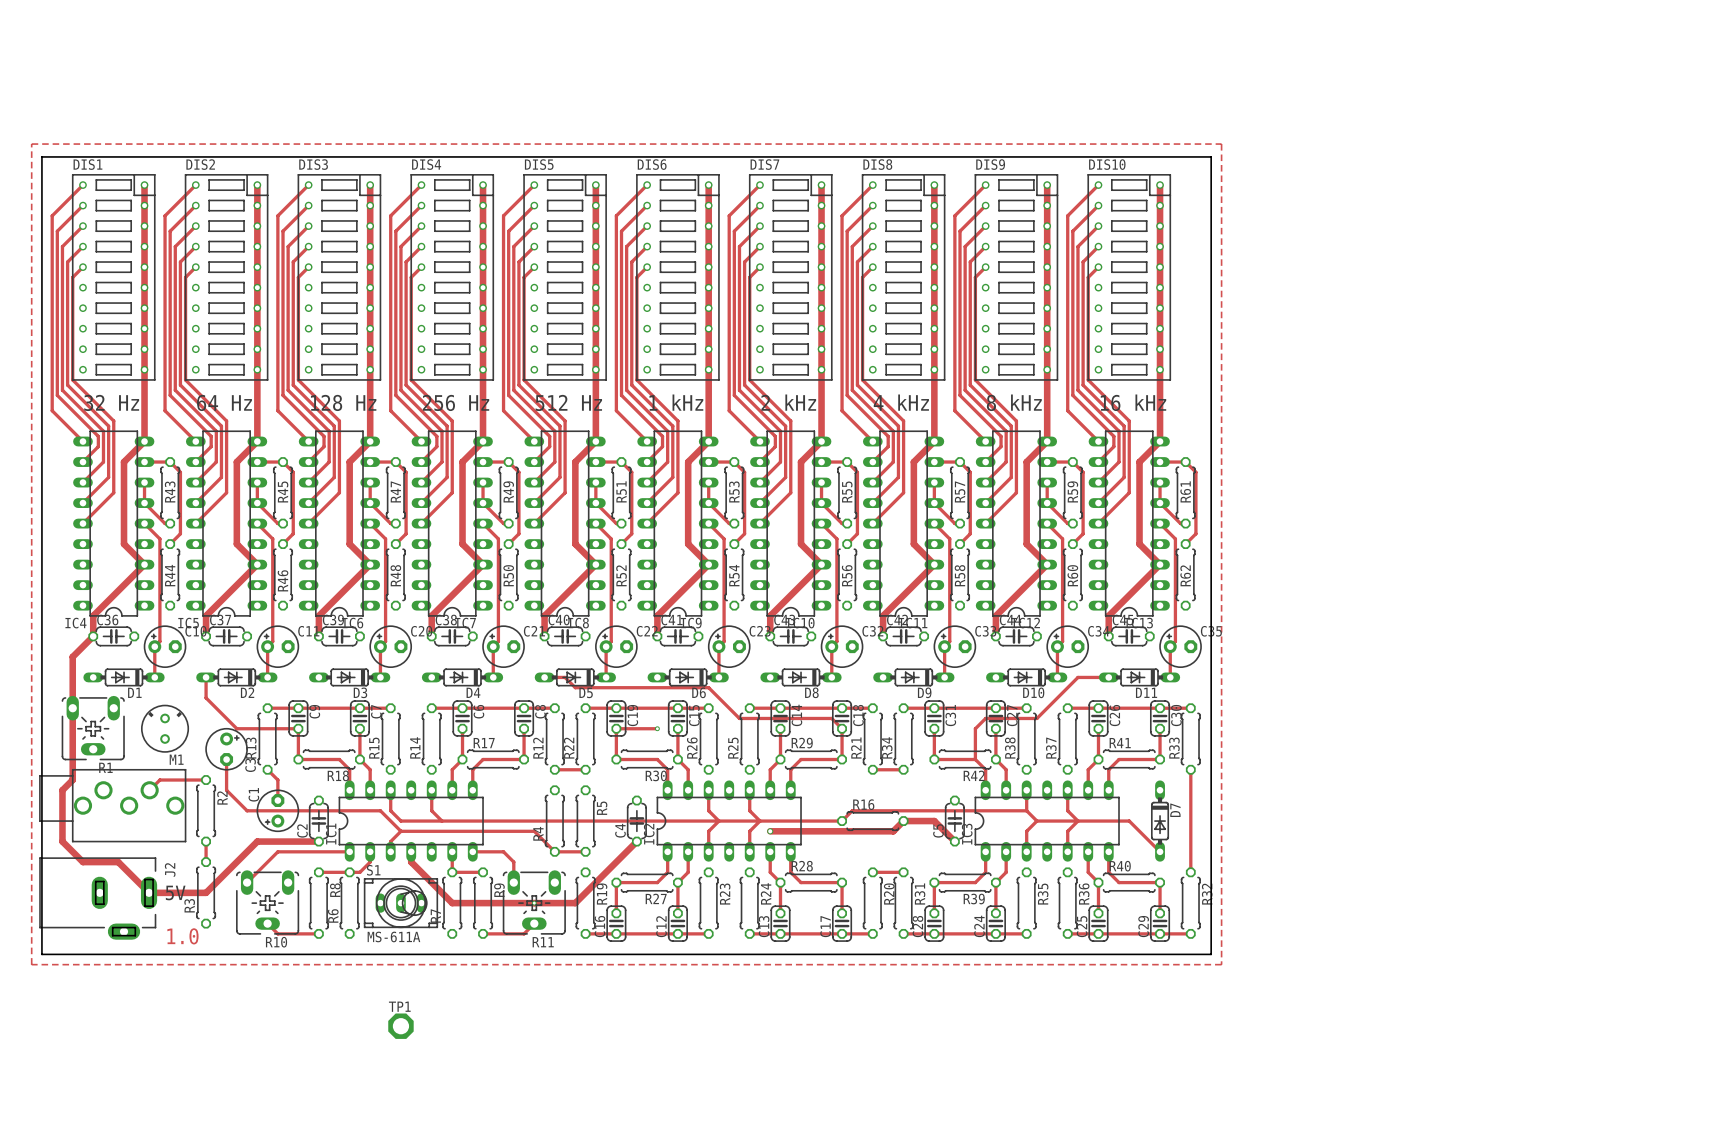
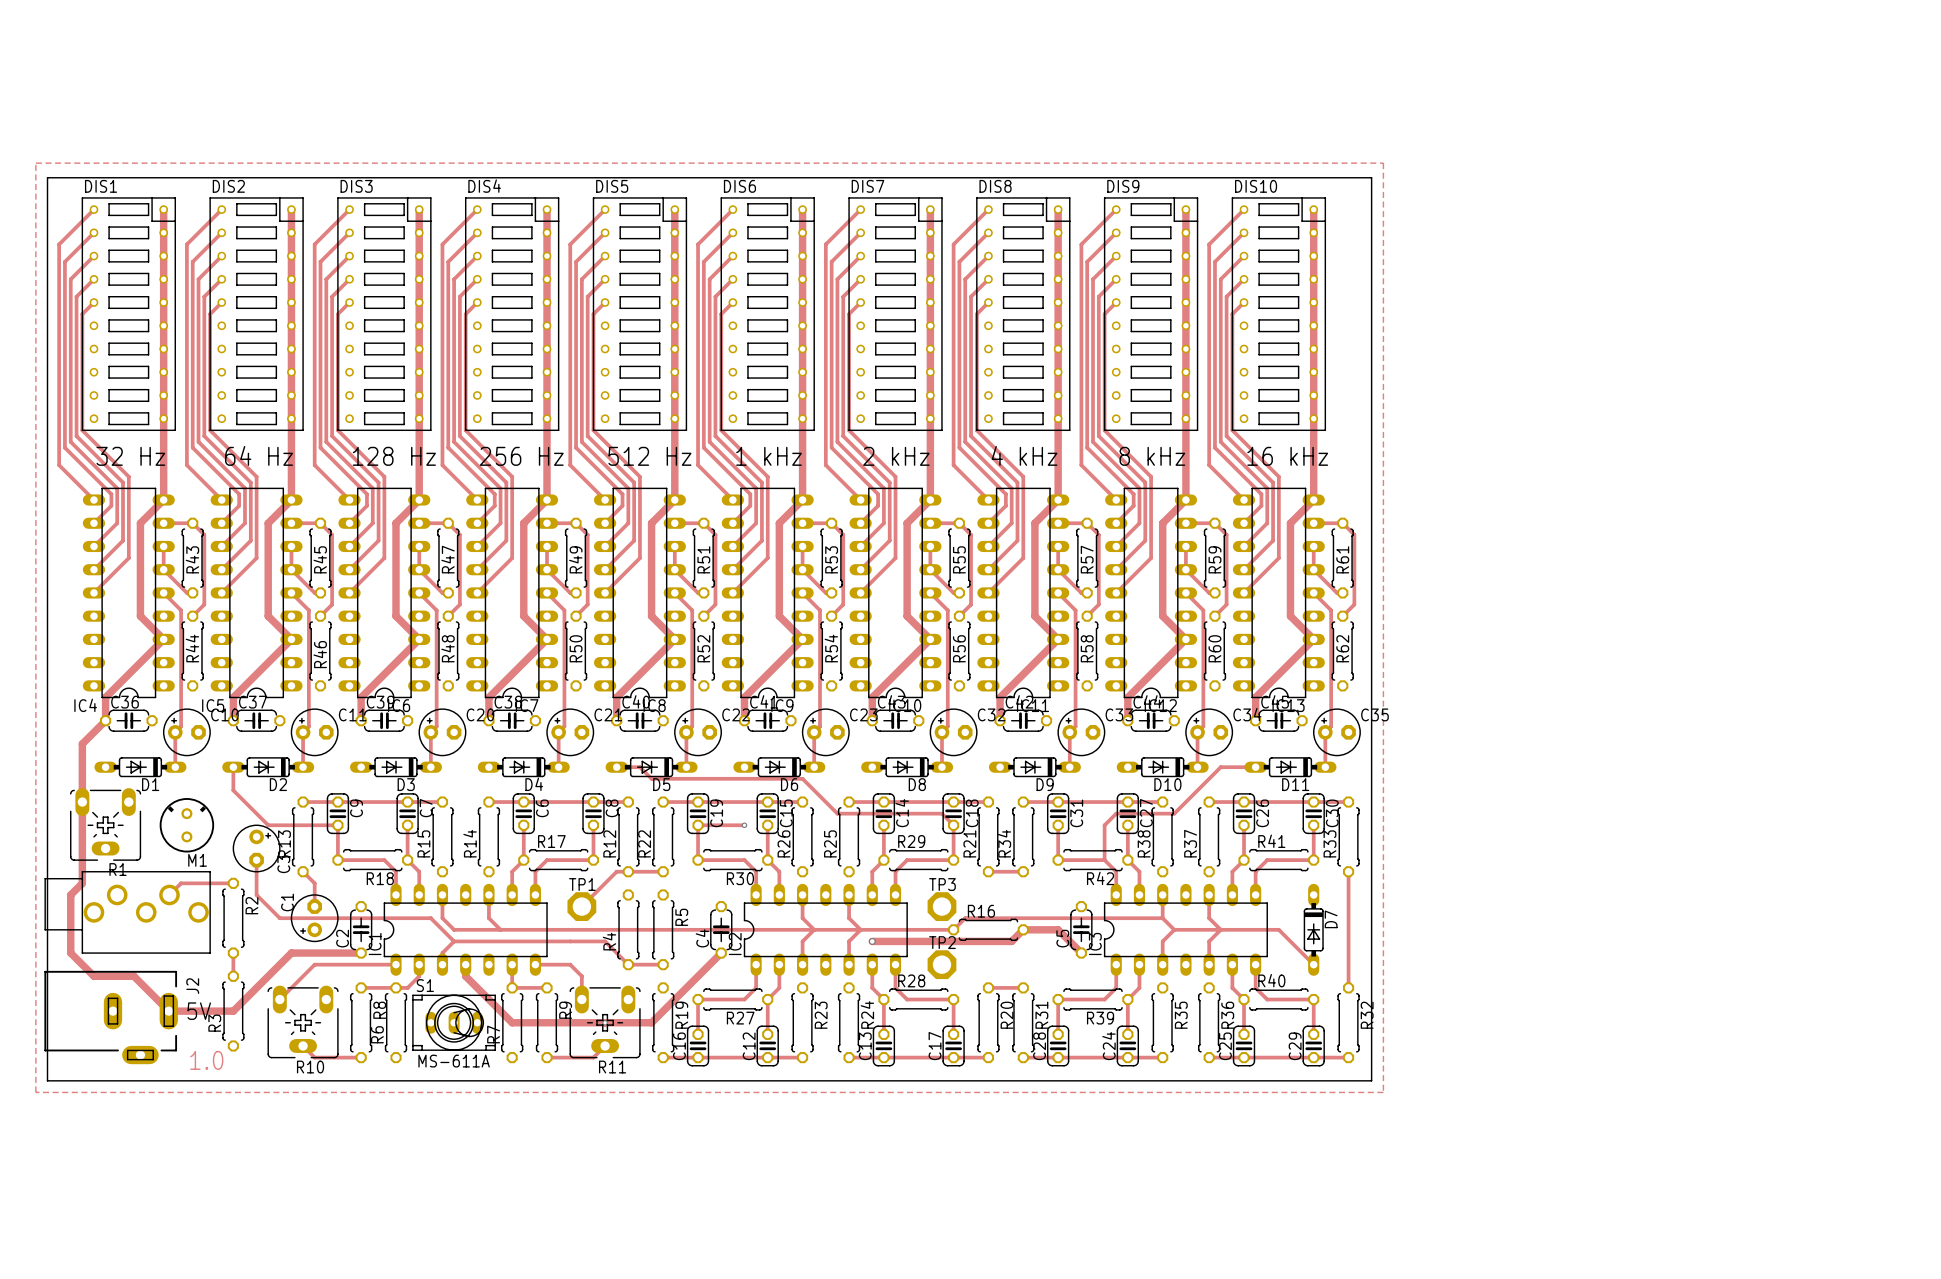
track: none -> (628, 871) (616, 871) (581, 906)
TP3: none -> (941, 906)
TP2: none -> (941, 964)
TP1 position: (400, 1026) -> (581, 906)

